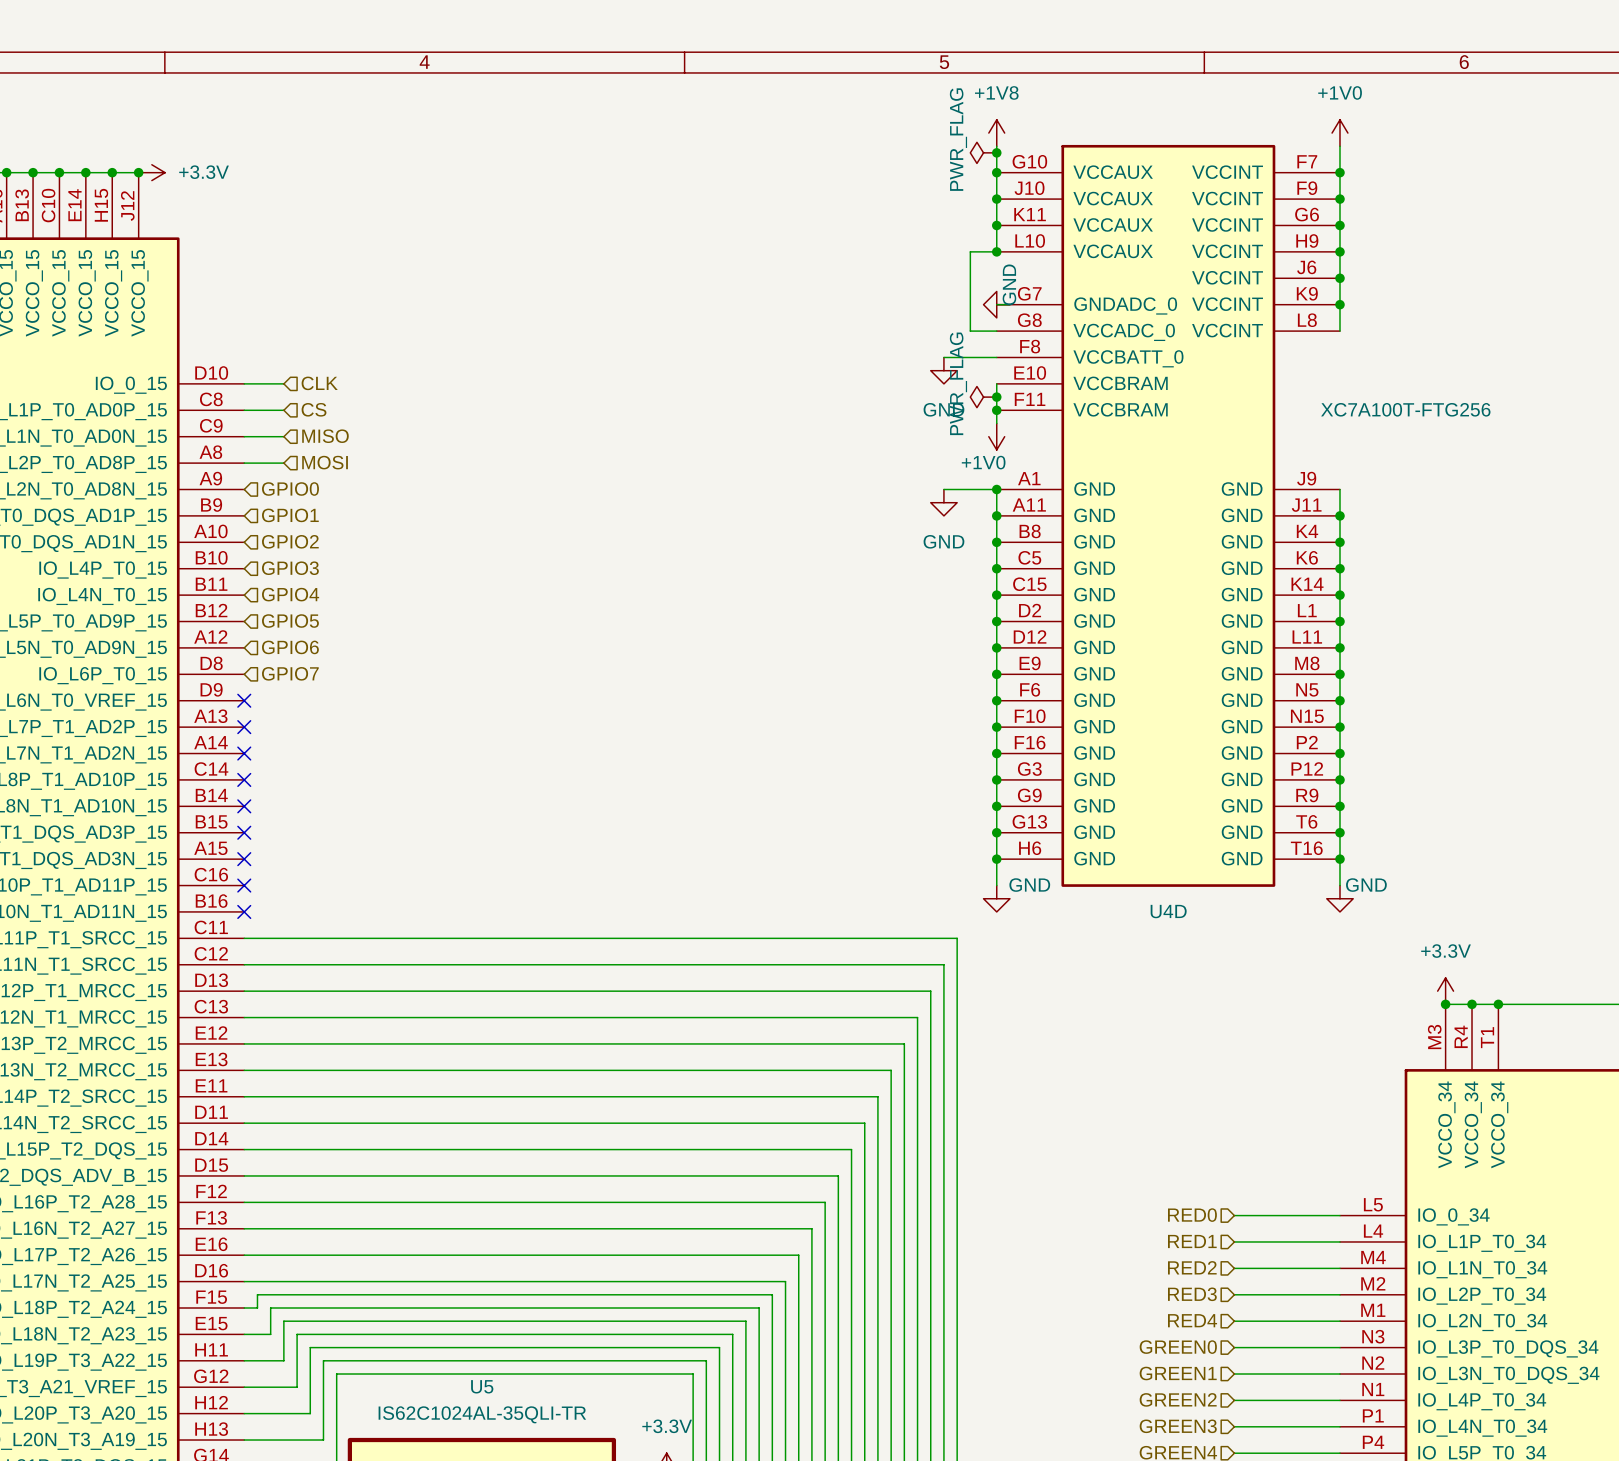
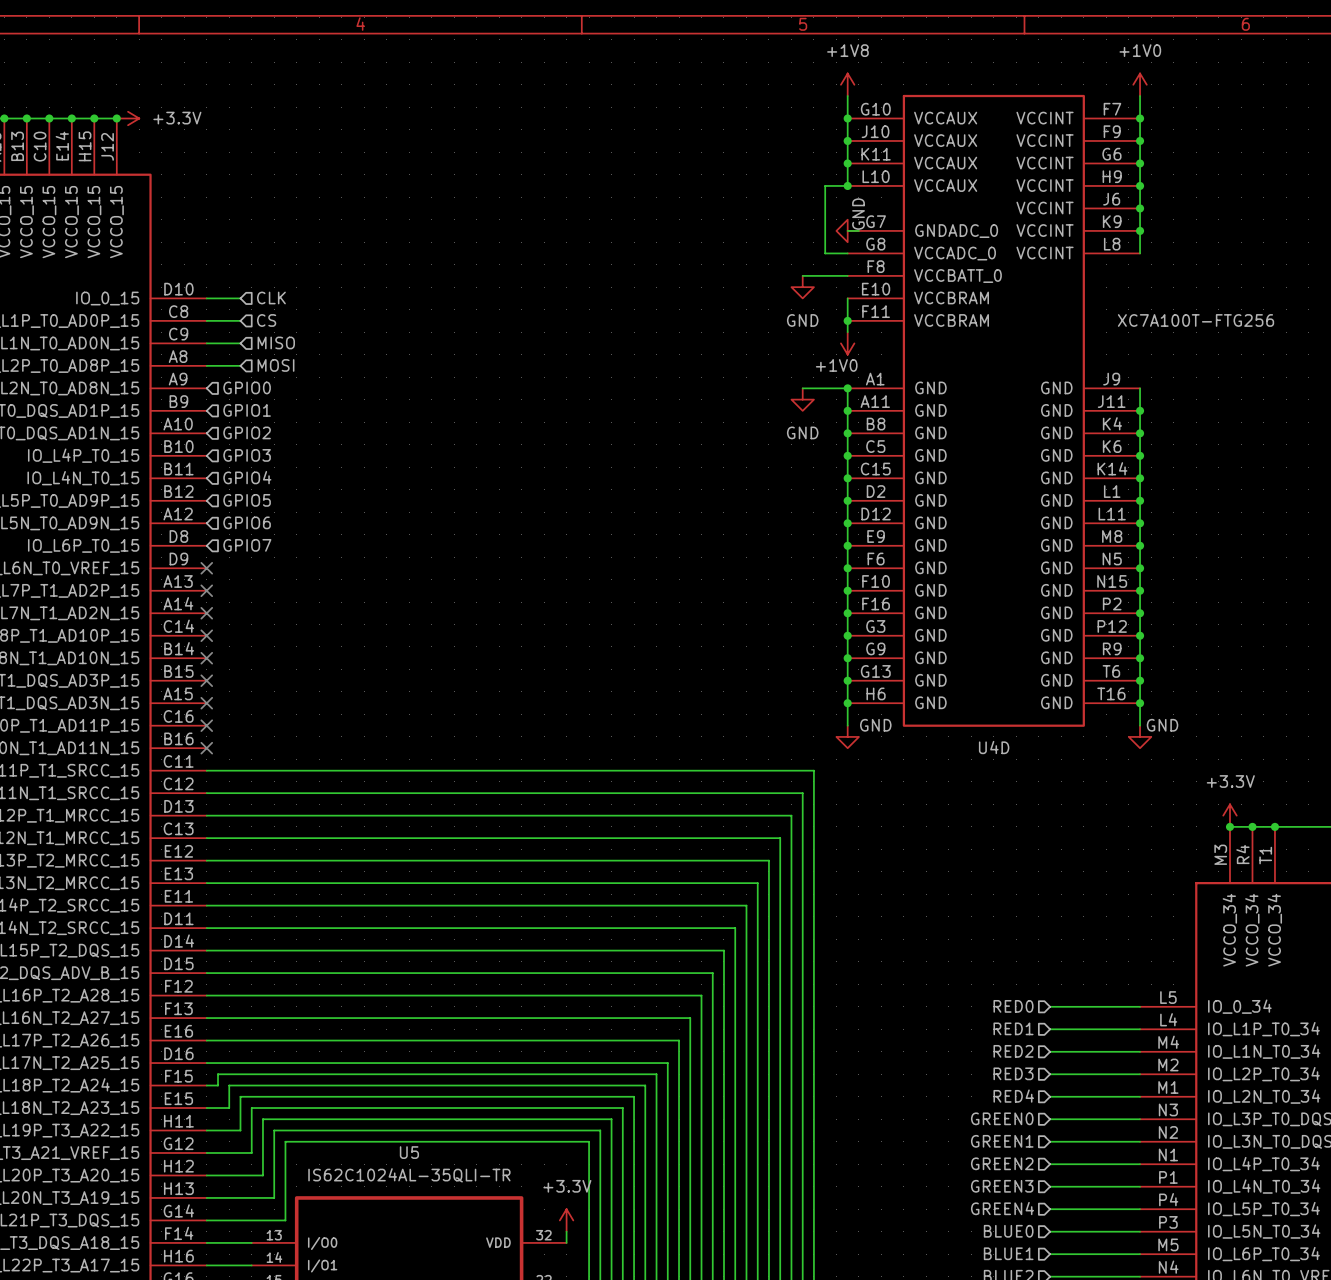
power symbol: PWR_FLAG (983, 152) -> none
junction: (996, 152) -> none
power symbol: PWR_FLAG (983, 397) -> none
junction: (996, 397) -> none

